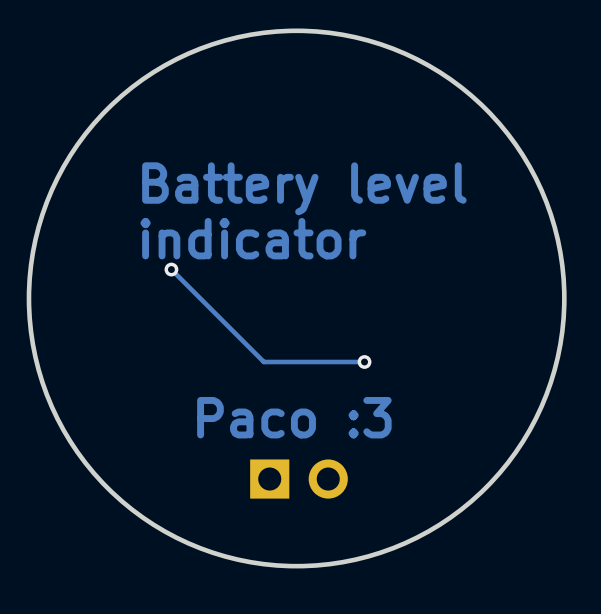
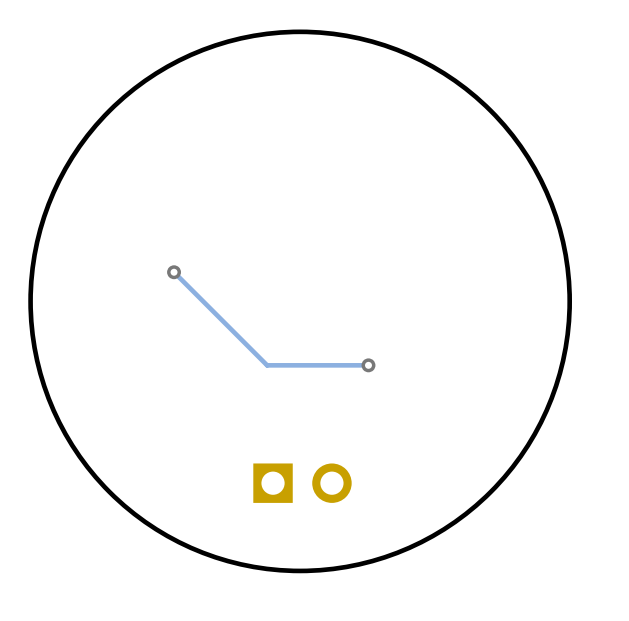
text: Battery level (304, 188) -> none
text: indicator (253, 238) -> none
text: Paco :3 (294, 417) -> none

